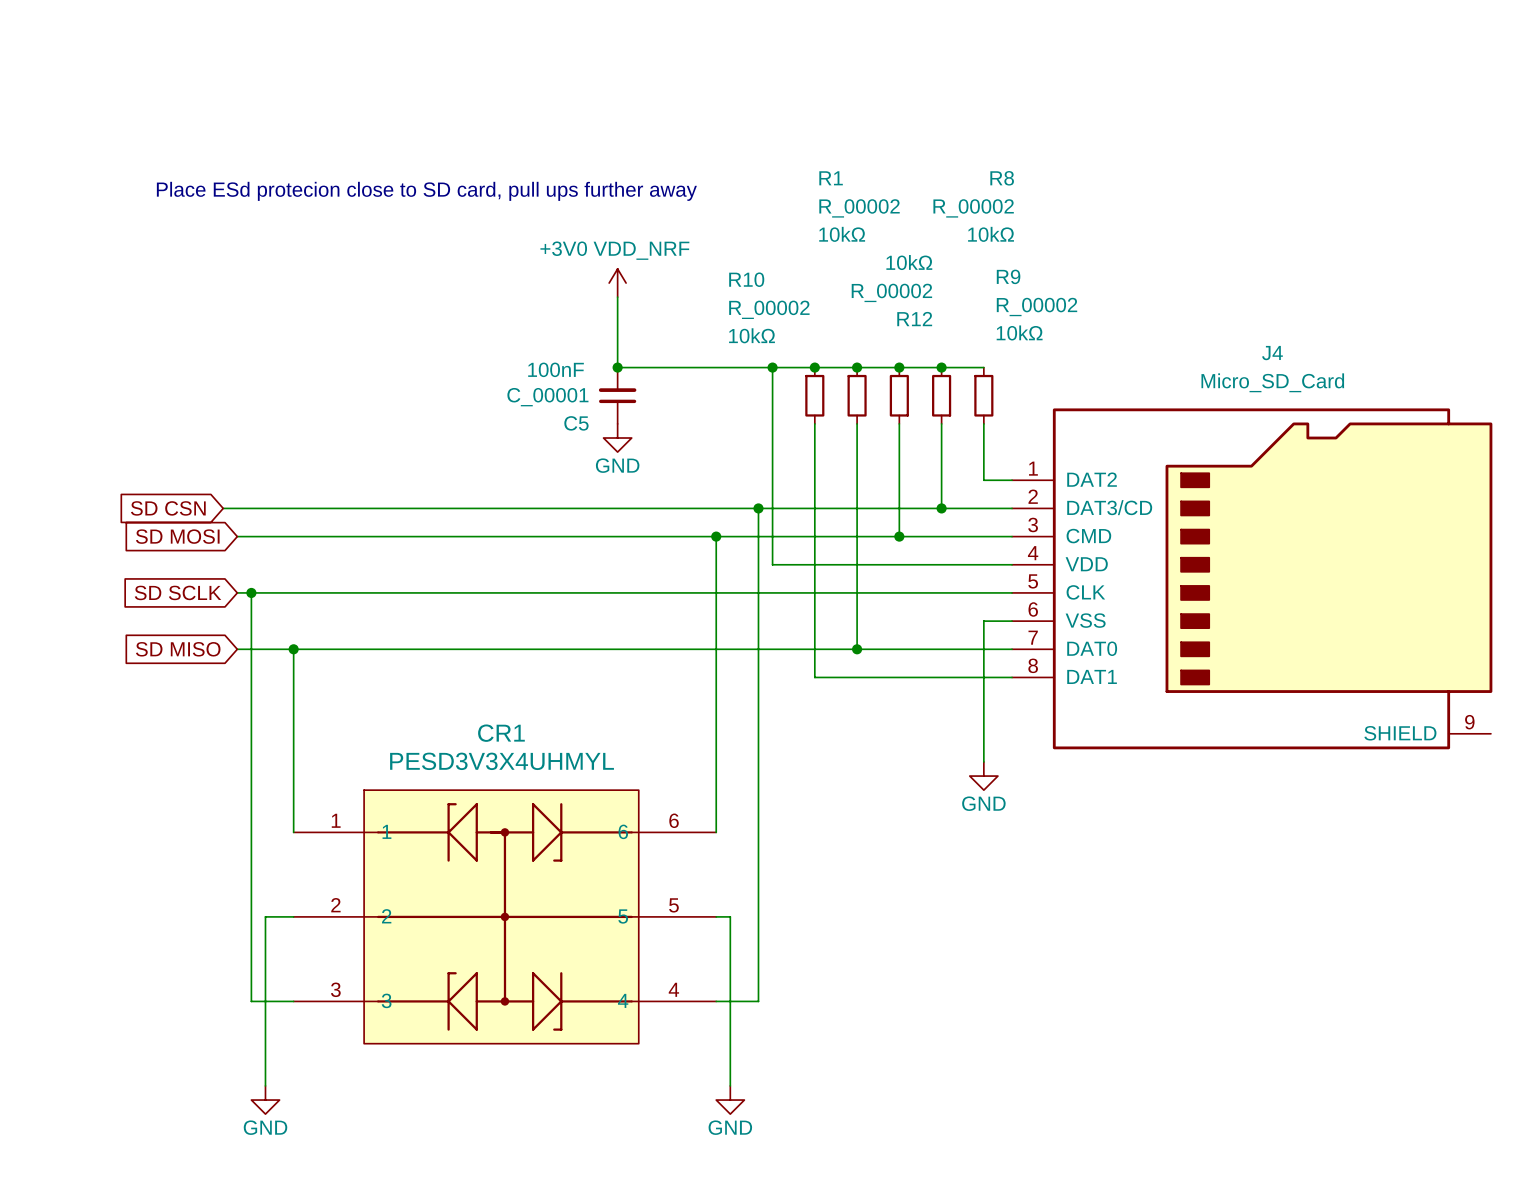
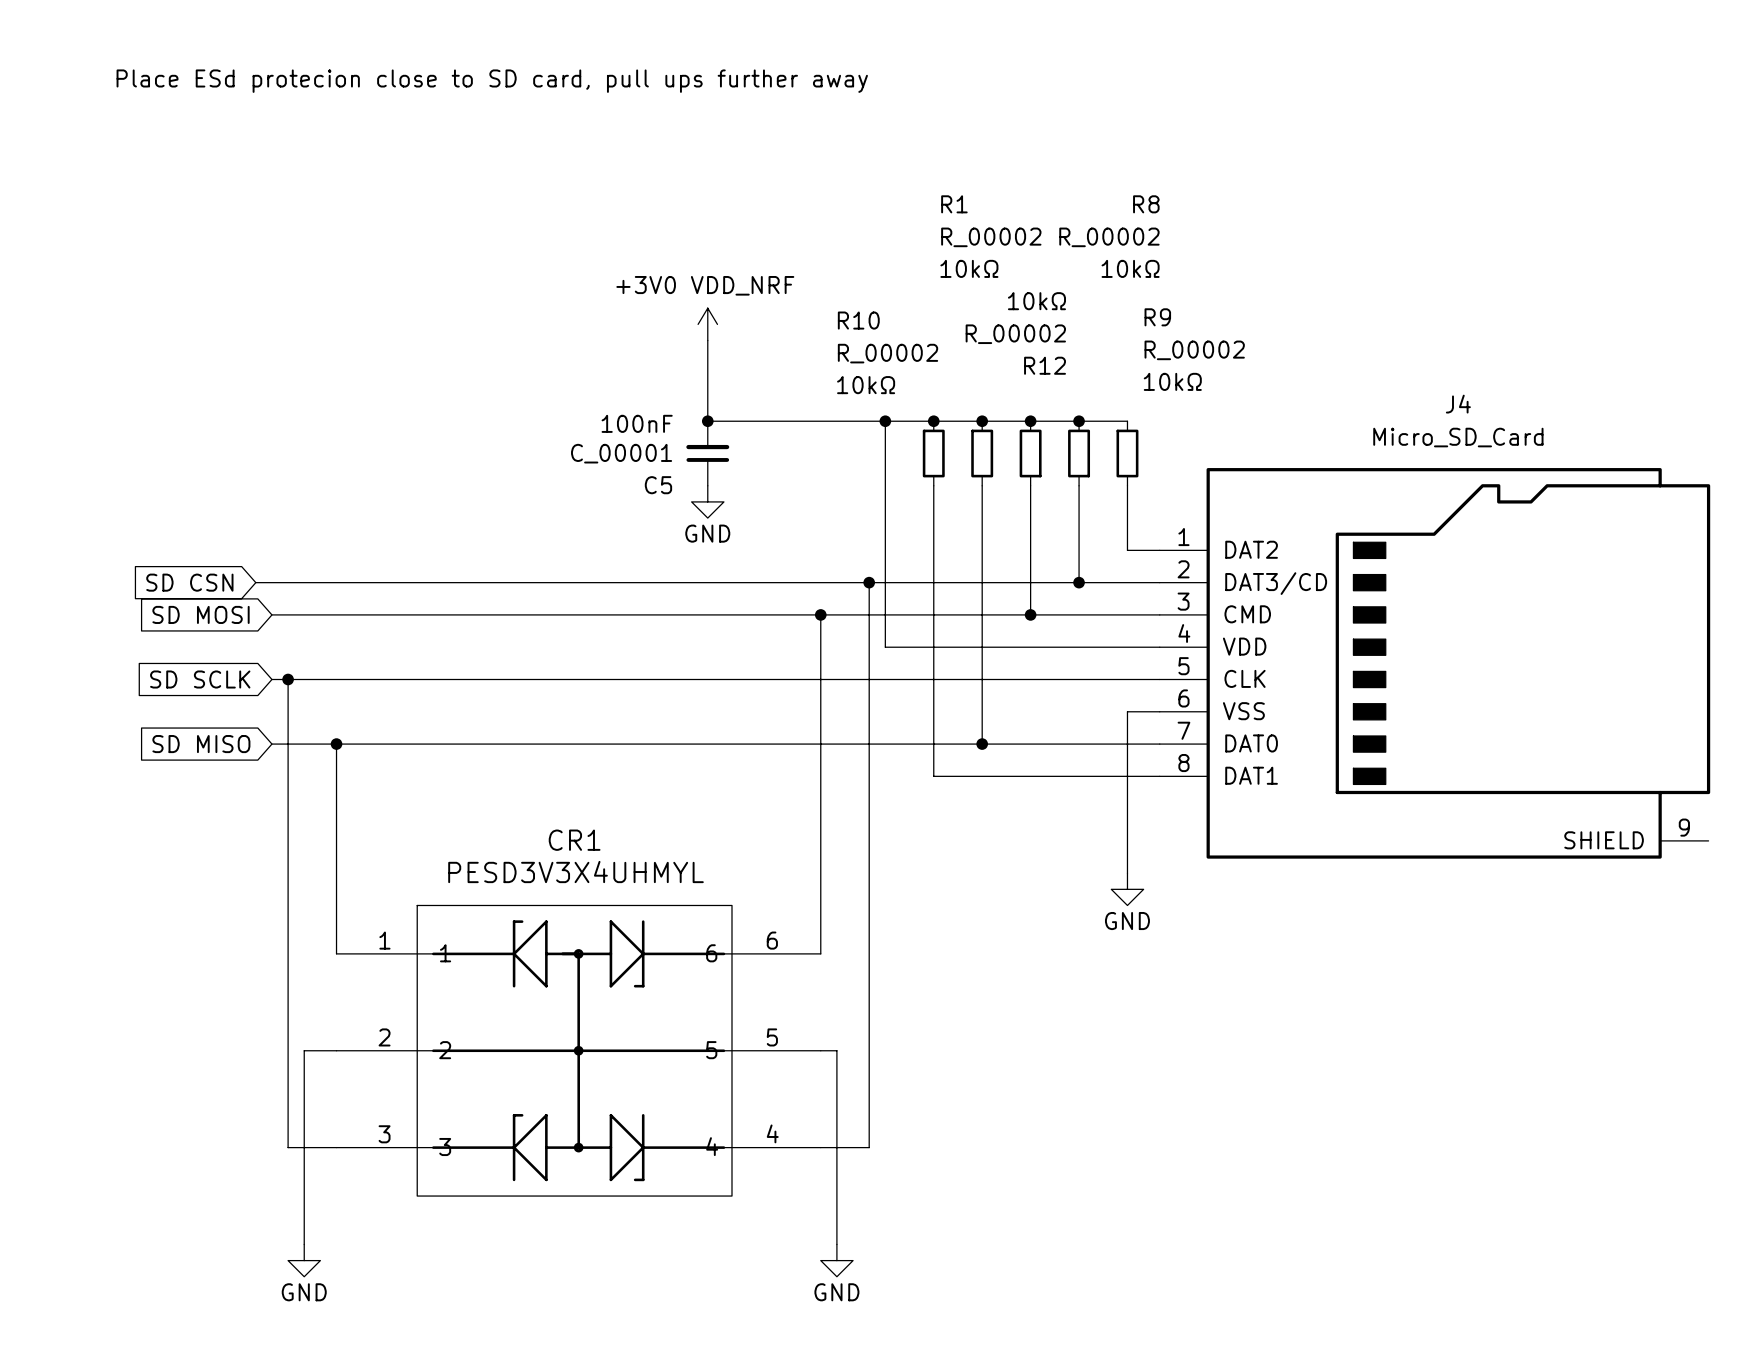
text position: Place ESd protecion close to SD card, pull ups further away (426, 191) -> Place ESd protecion close to SD card, pull ups further away (492, 81)

